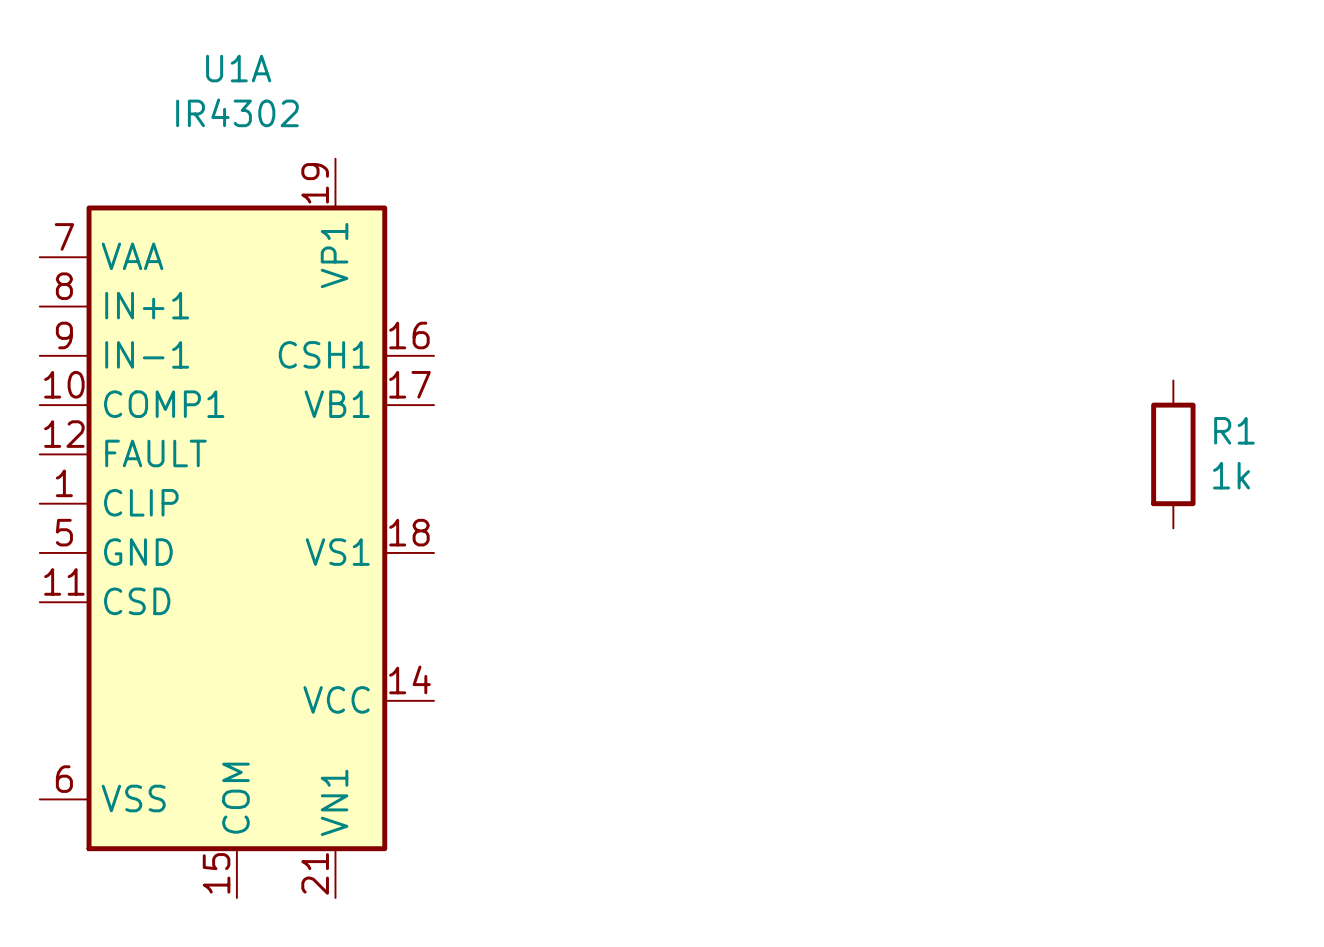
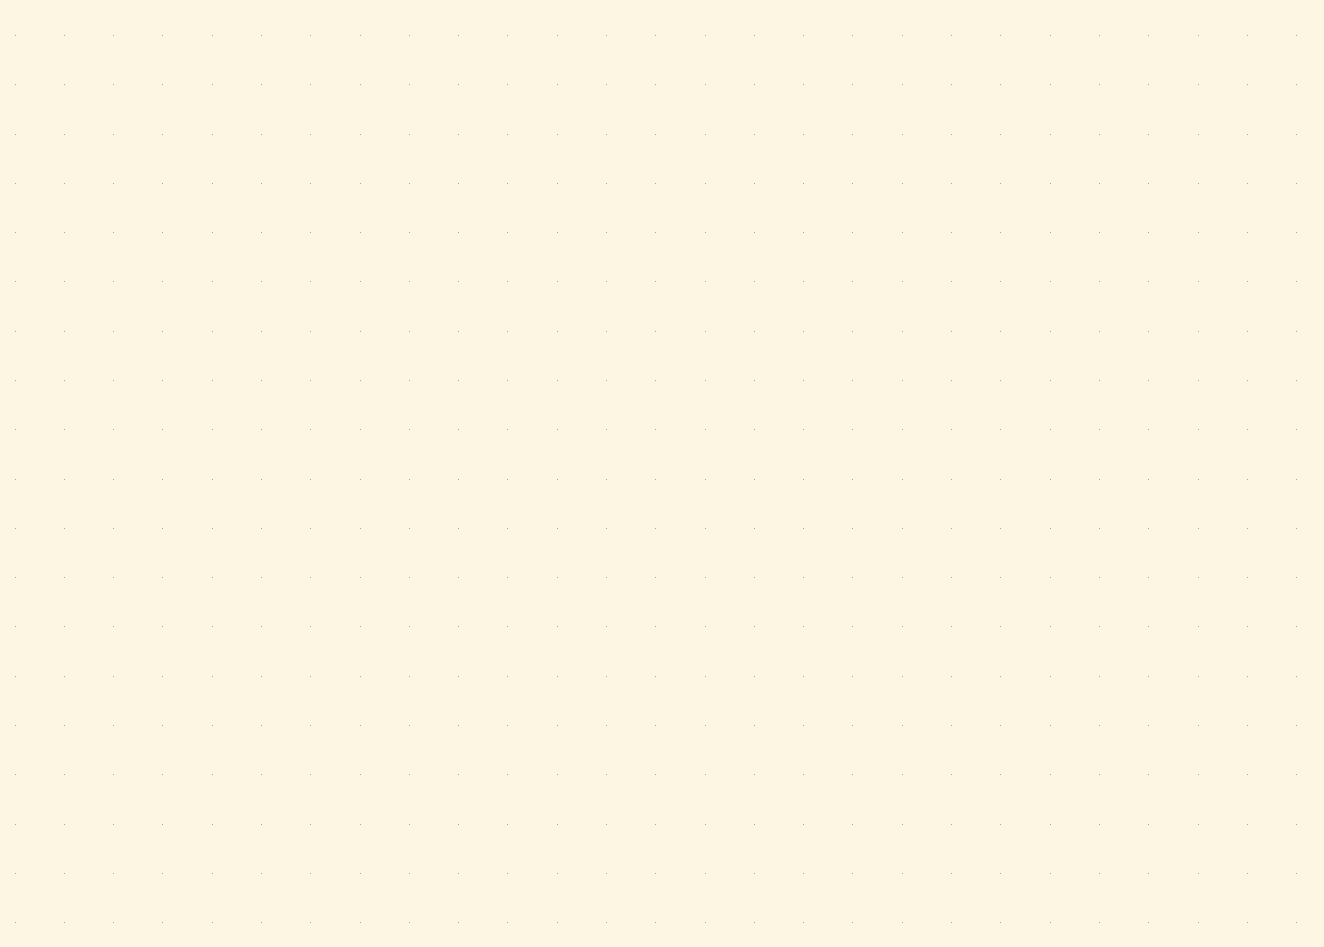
R1: 1k (1173, 454) -> none
U1A: IR4302 (236, 528) -> none

